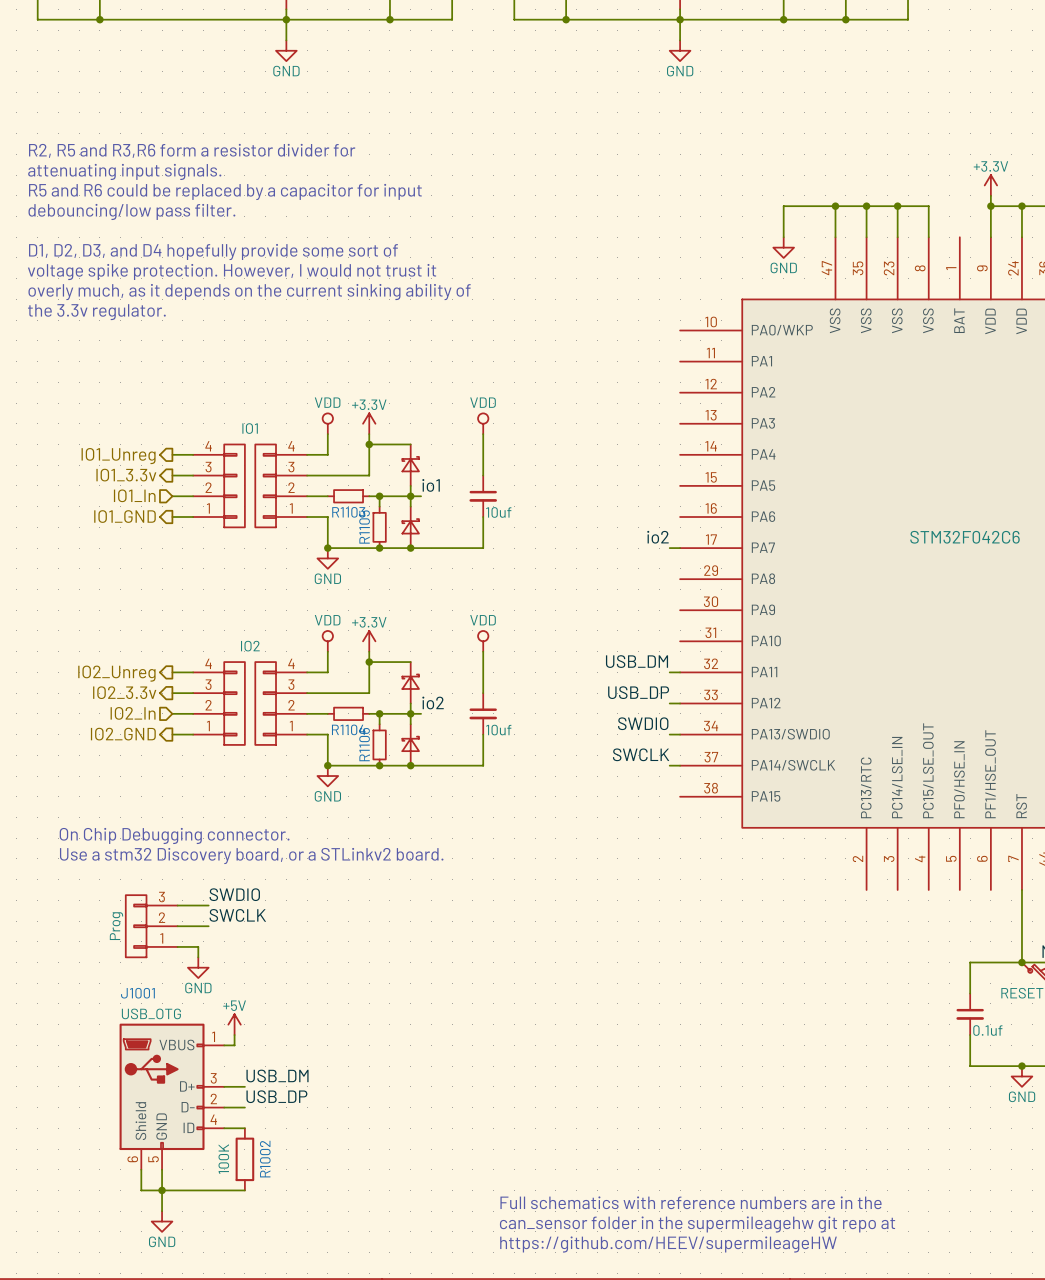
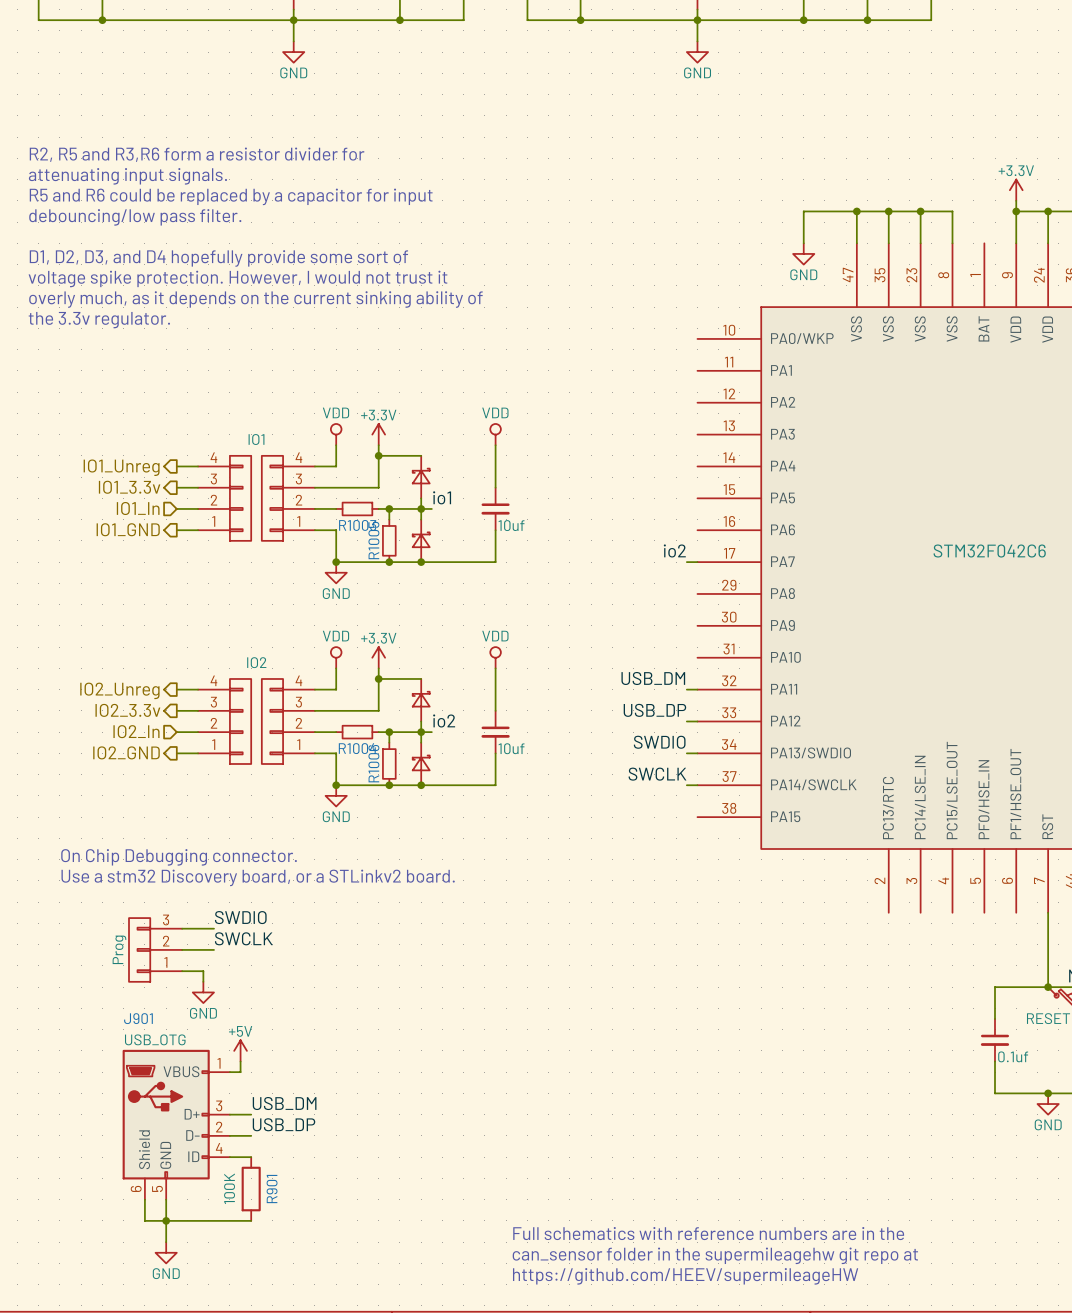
R1103 name: R1103 (348, 512) -> R1003 (357, 525)
R1105 name: R1105 (364, 527) -> R1005 (373, 540)
R1104 name: R1104 (348, 729) -> R1004 (357, 748)
R1106 name: R1106 (364, 744) -> R1006 (373, 763)
J1001 name: J1001 (137, 993) -> J901 (138, 1018)
R1002 name: R1002 (265, 1159) -> R901 (272, 1189)

